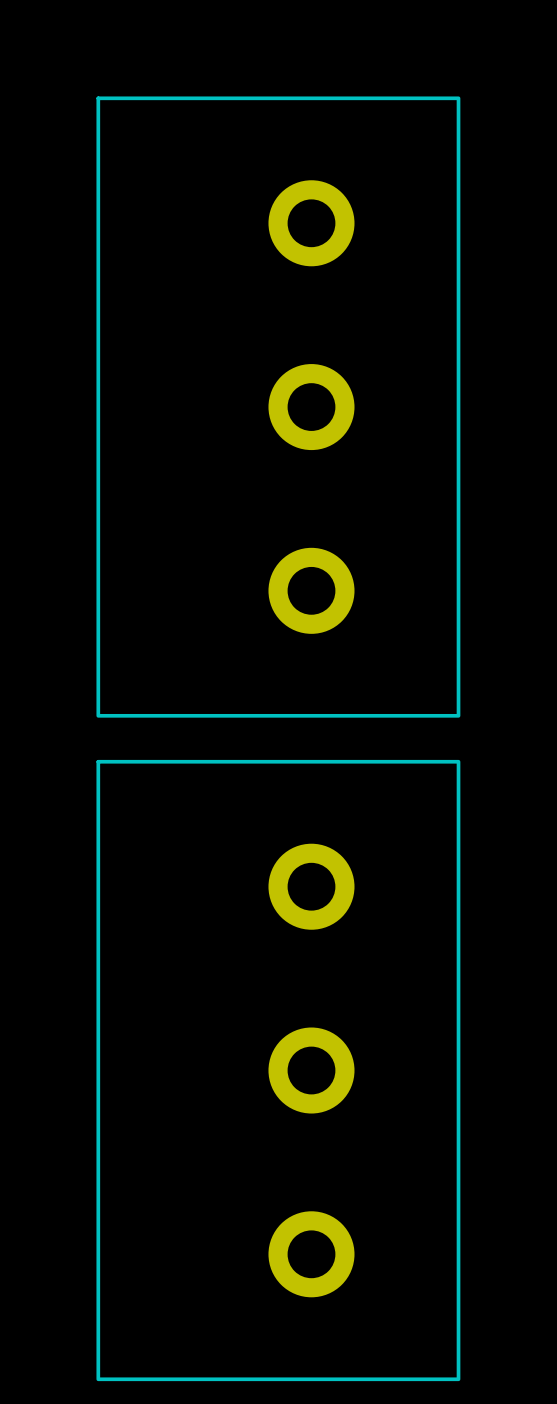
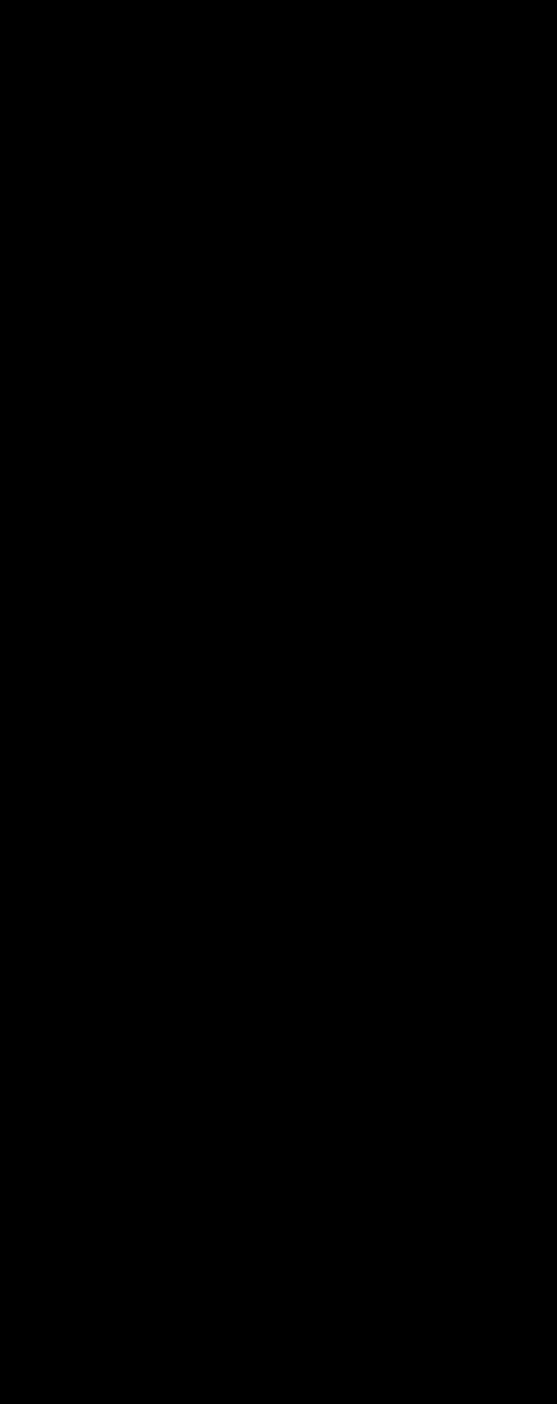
part: (278, 407) -> none
part: (278, 1070) -> none

